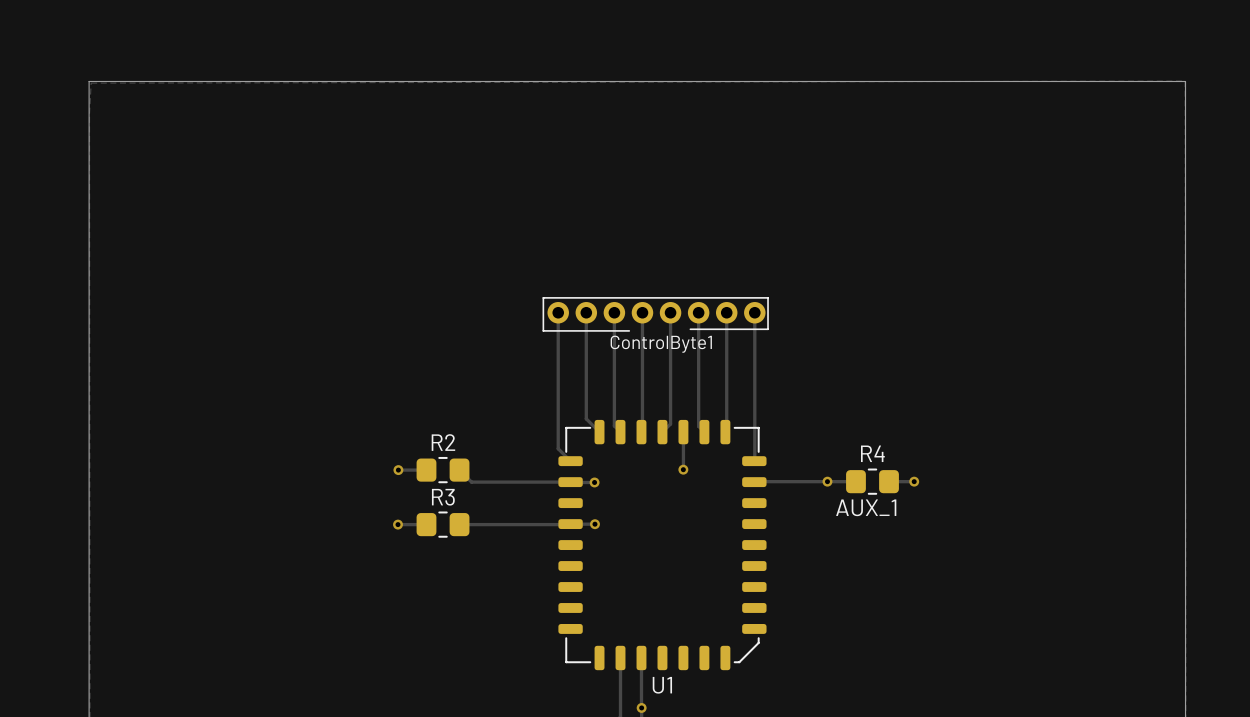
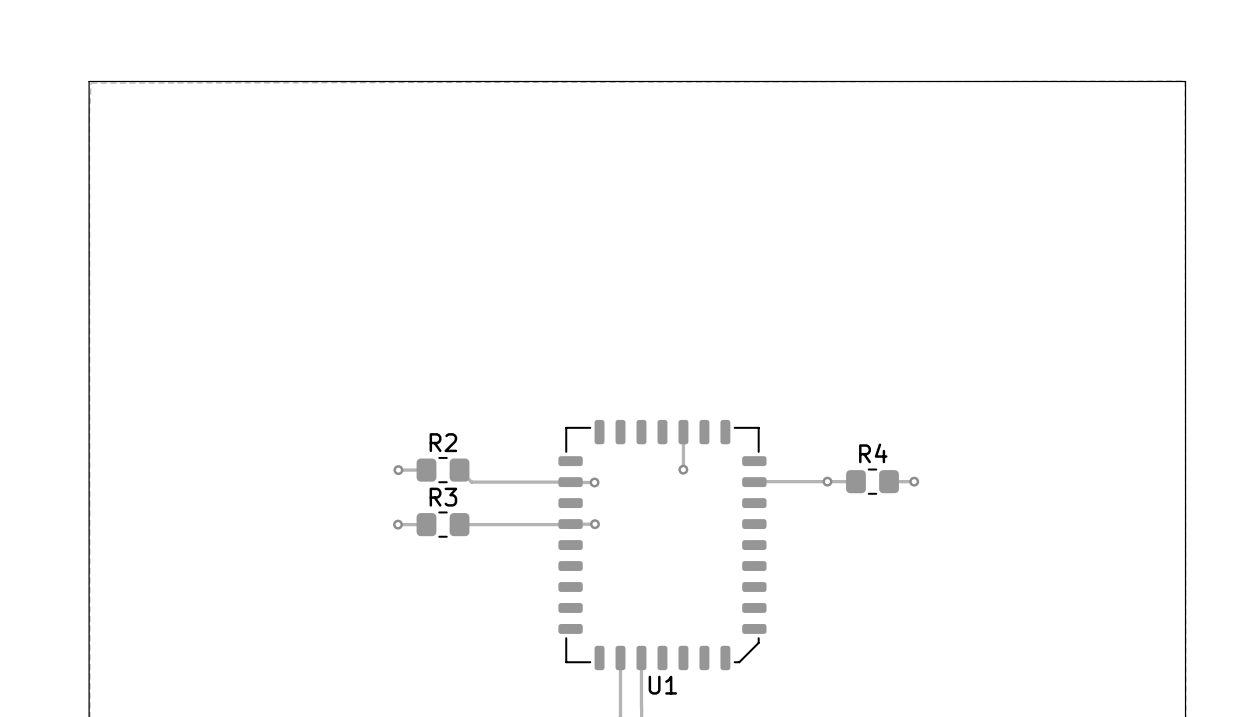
track: (558, 312) (558, 448) (570, 461) -> none
track: (586, 312) (586, 418) (599, 432) -> none
track: (614, 312) (614, 425) (620, 432) -> none
track: (642, 312) (641, 432) -> none
track: (670, 312) (670, 424) (662, 432) -> none
track: (698, 312) (698, 426) (704, 432) -> none
track: (726, 312) (725, 432) -> none
track: (754, 312) (754, 461) -> none
ControlByte1: (655, 314) -> none
text: AUX_1 (866, 507) -> none
via: (641, 707) -> none

